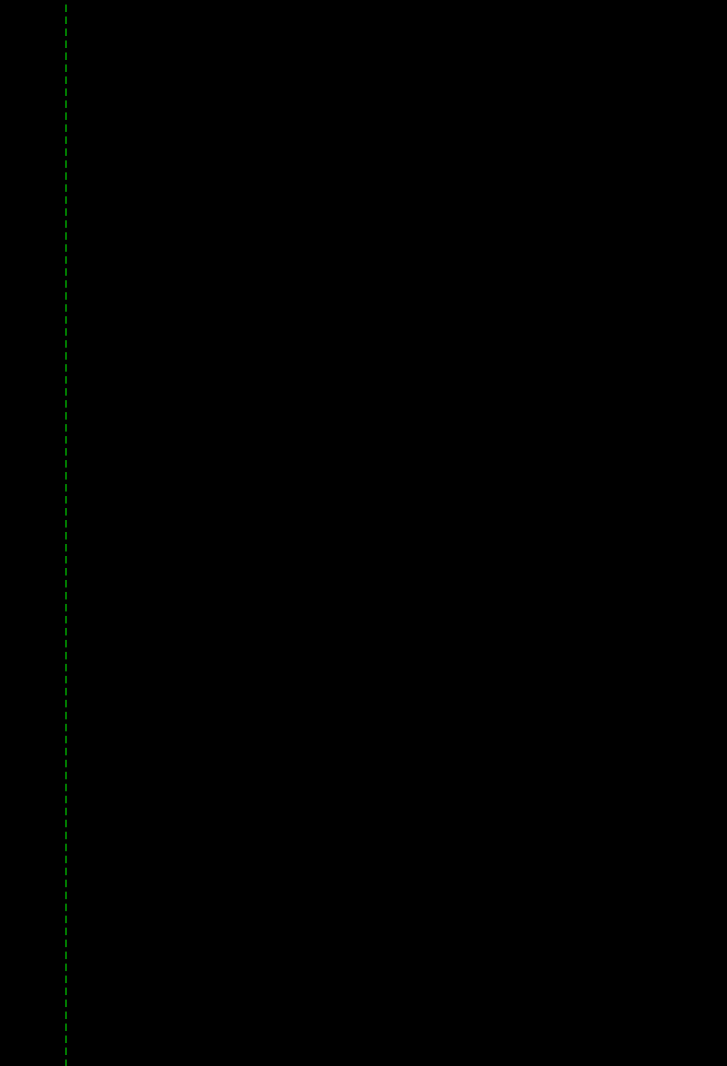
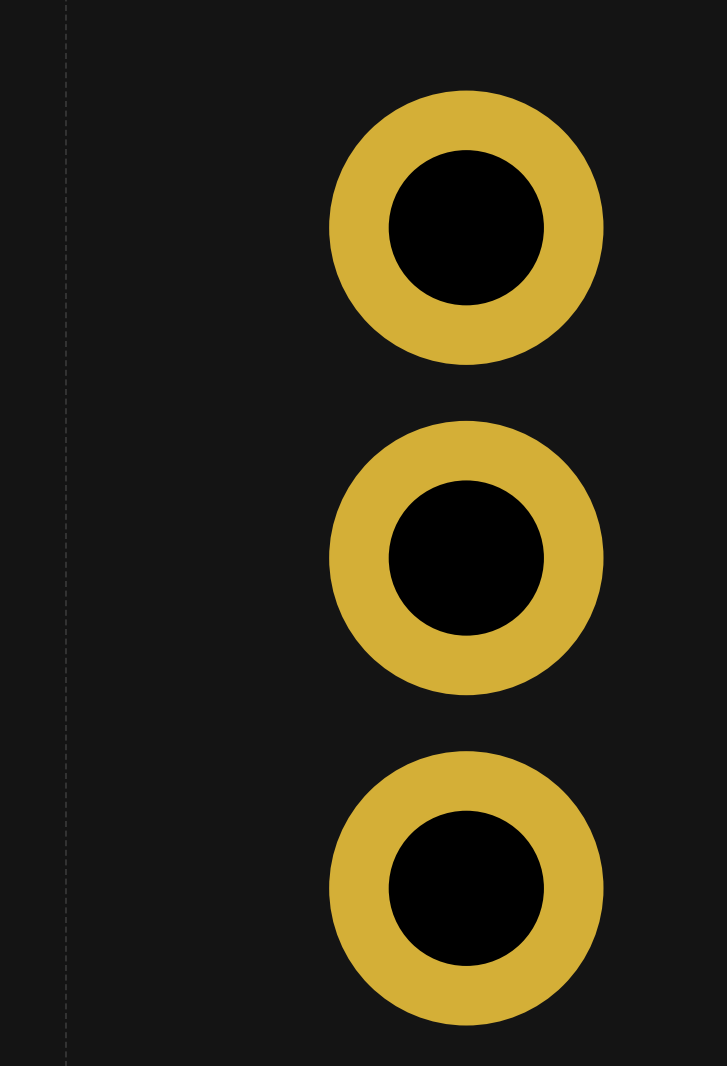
part: none -> (466, 227)
part: none -> (466, 558)
part: none -> (466, 888)

